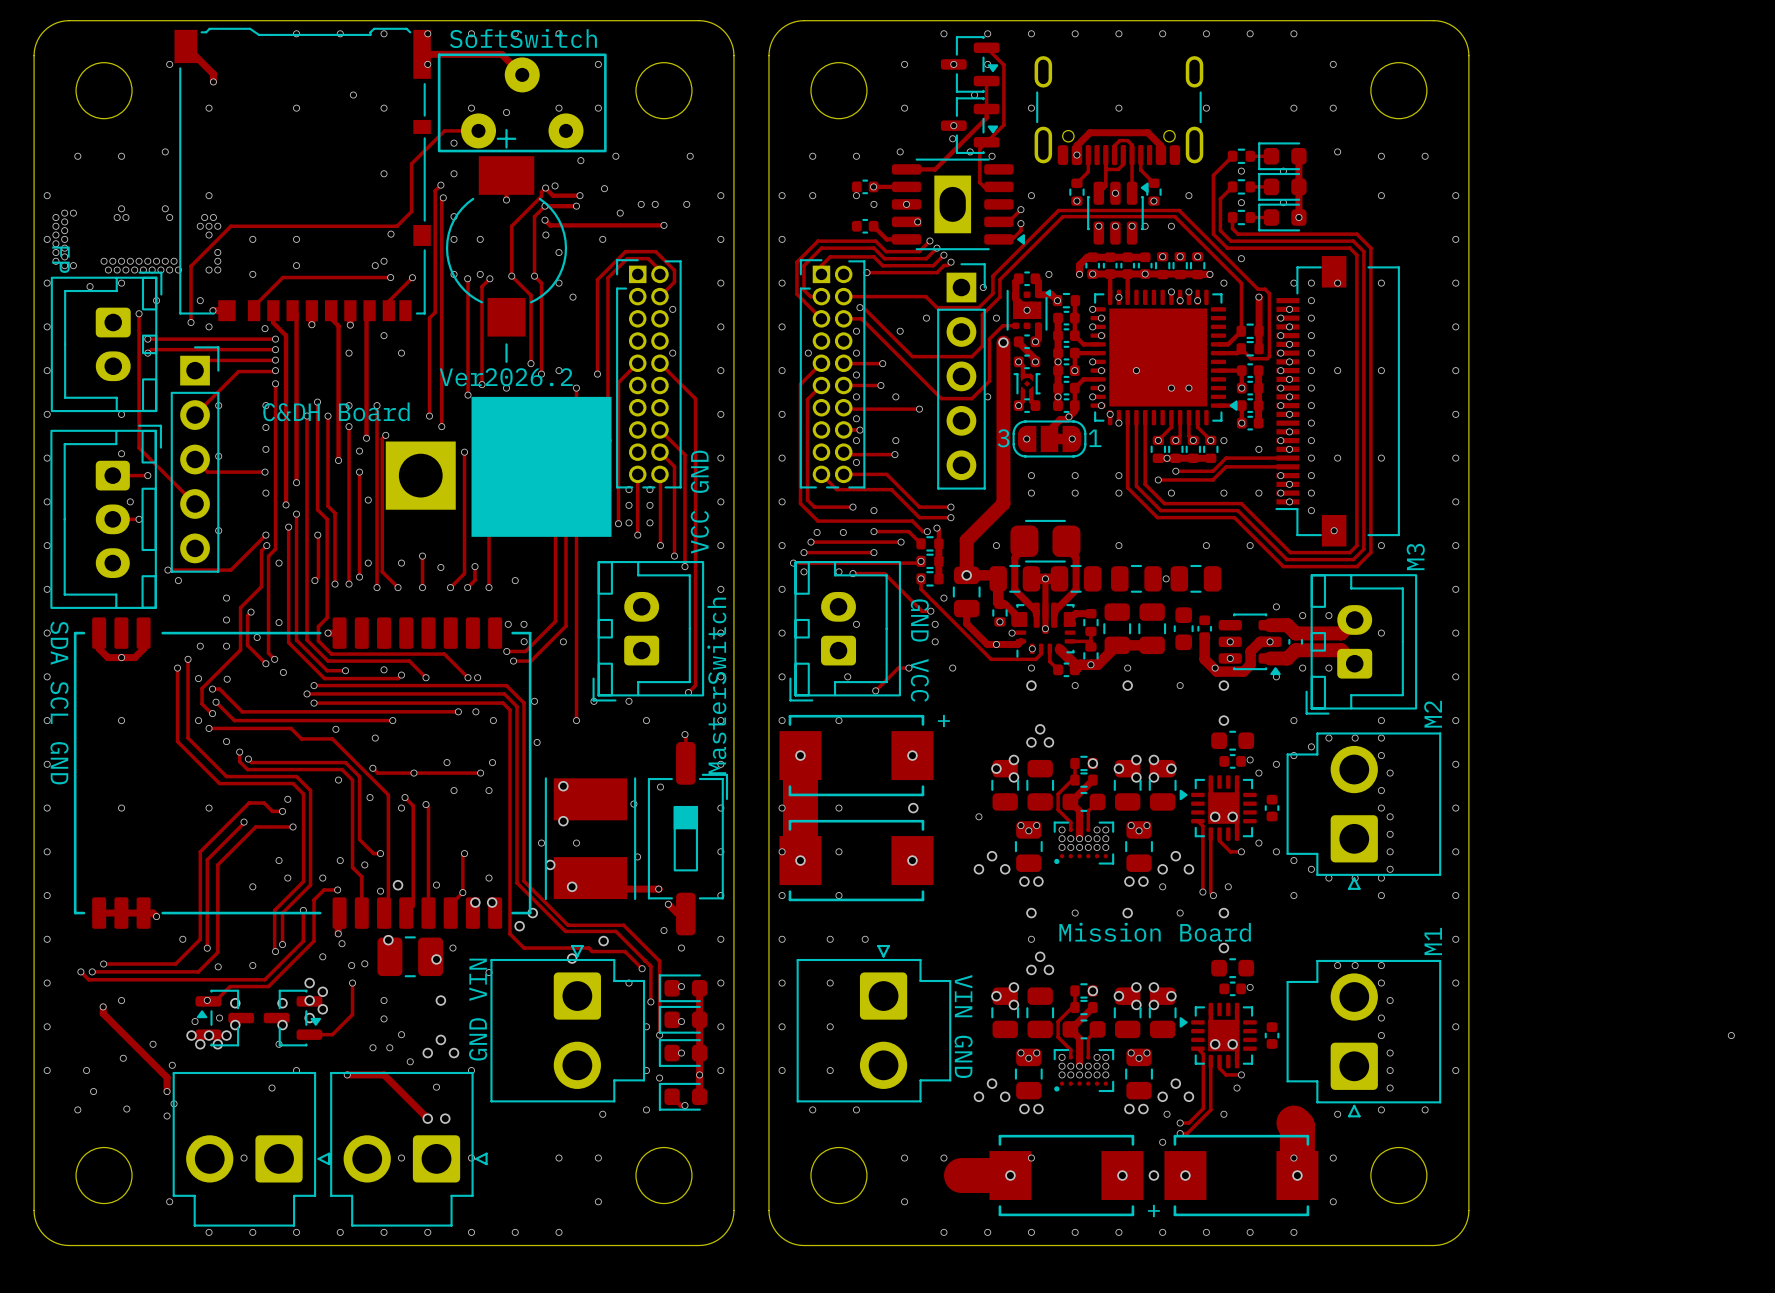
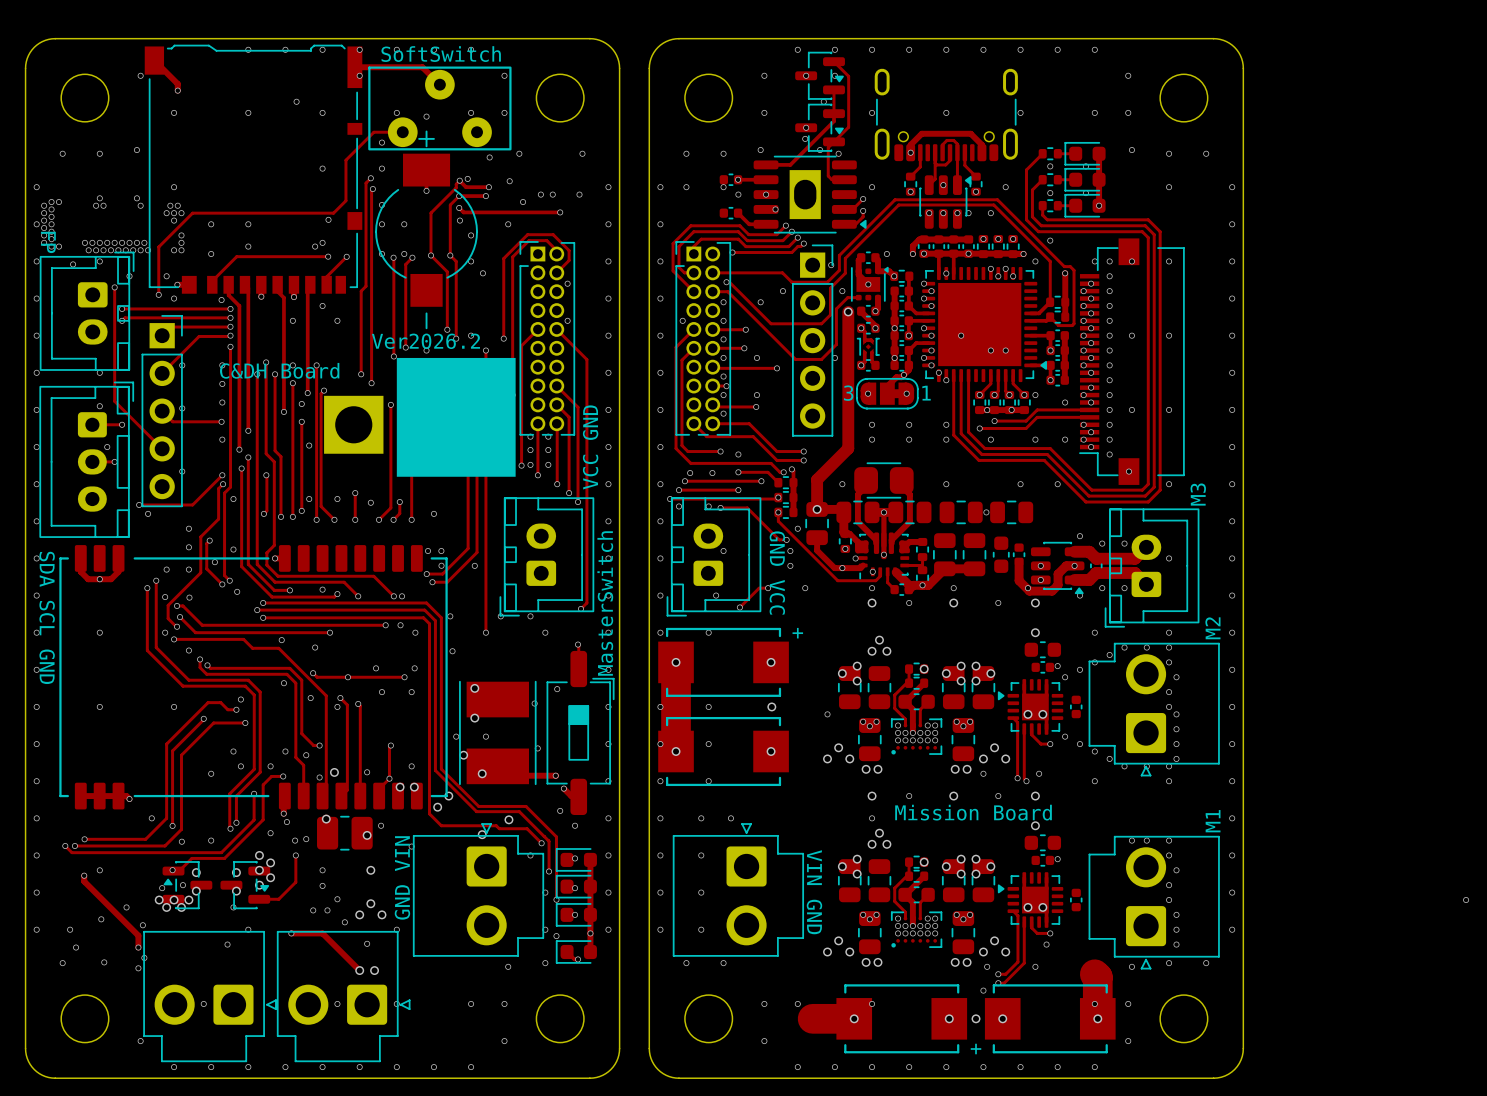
via: none -> (1011, 409)

